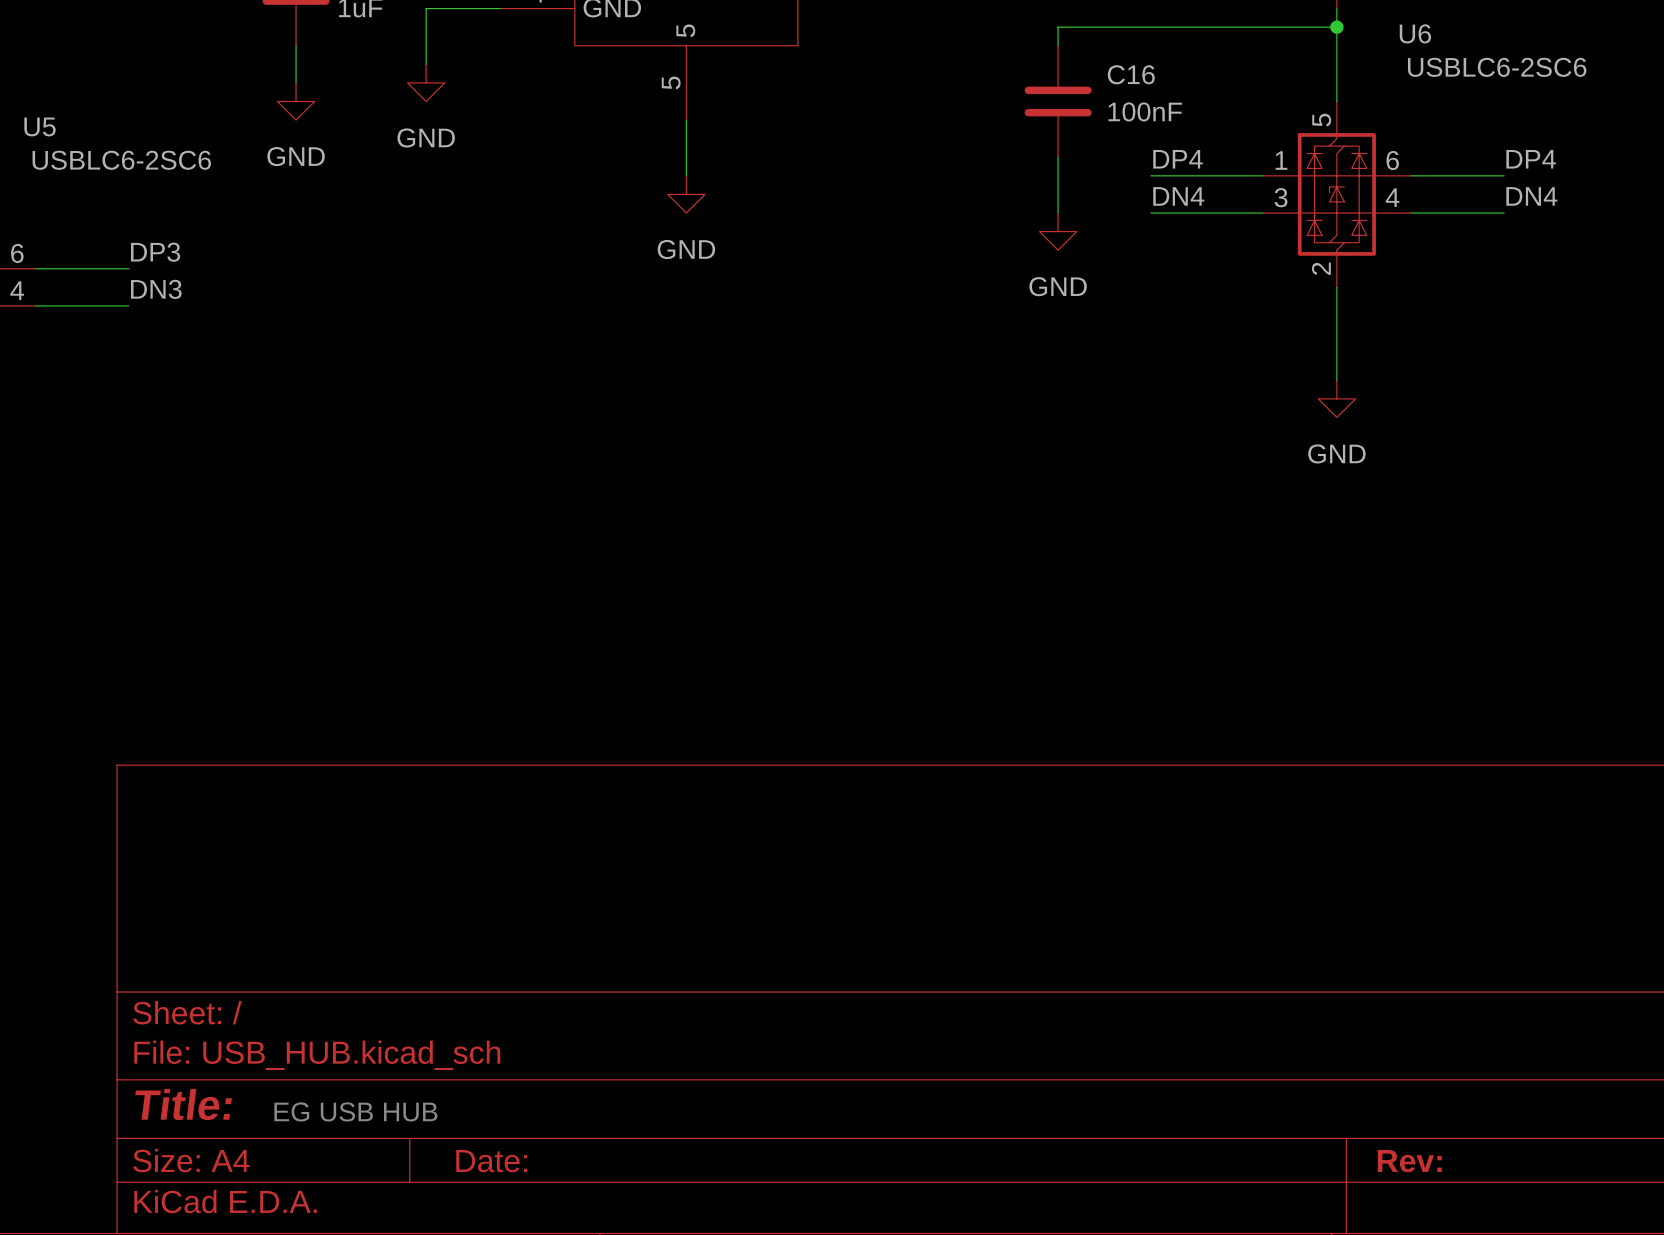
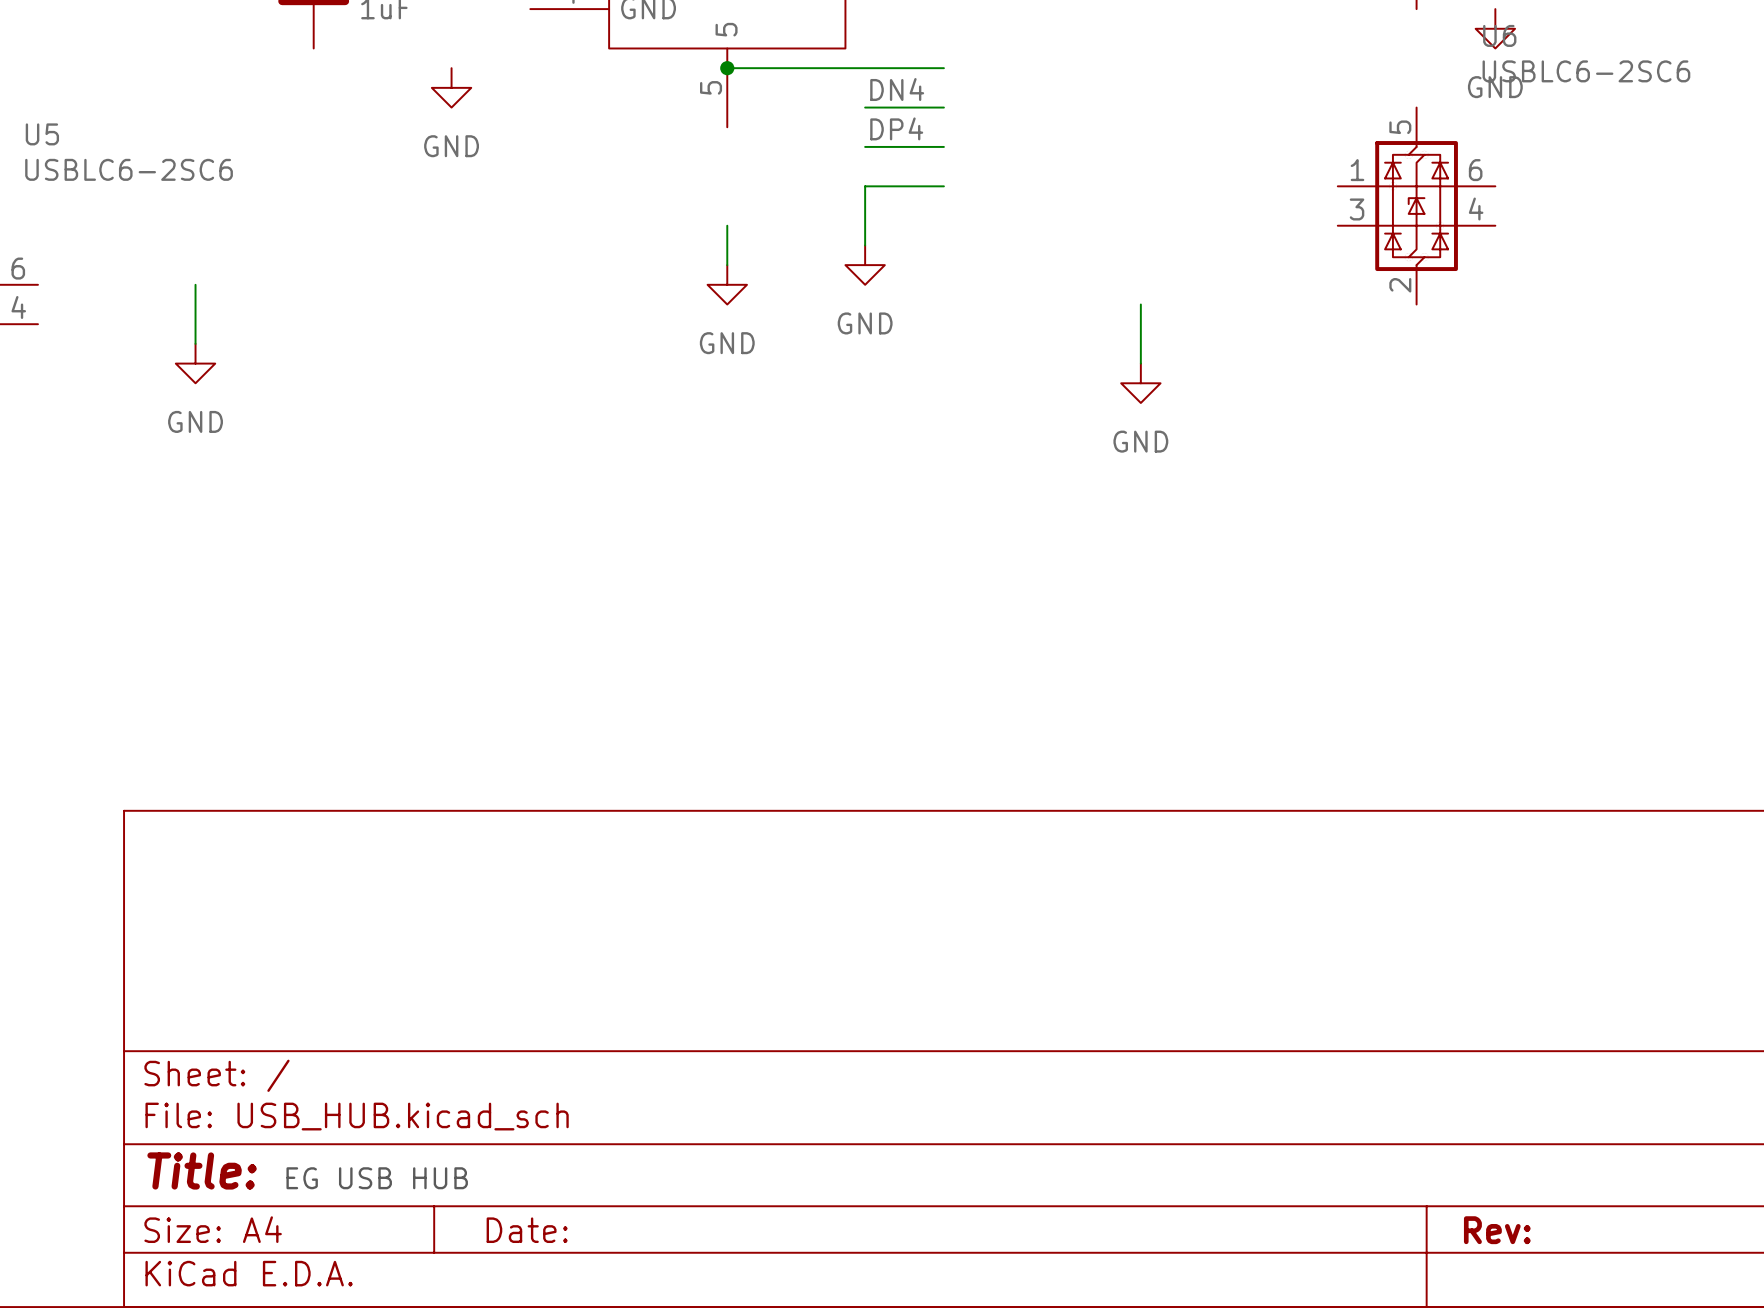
wire: (500, 8) (426, 8) (426, 64) -> none
wire: (1336, 8) (1336, 101) -> none
wire: (1336, 27) (1058, 27) (1058, 45) -> none
junction: (1336, 27) -> none
power symbol: none -> GND (1495, 28)
wire: (296, 45) (296, 82) -> none
wire: none -> (727, 68) (943, 68)
junction: none -> (727, 68)
label: none -> DN4 (897, 89)
power symbol: GND (296, 101) -> none
wire: none -> (865, 107) (943, 107)
C16: 100nF (1058, 101) -> none
wire: (686, 120) (686, 175) -> none
label: none -> DP4 (896, 128)
wire: none -> (865, 146) (943, 146)
wire: (1058, 157) (1058, 213) -> (1140, 304) (1140, 363)
label: DP4 (1178, 159) -> none
label: DP4 (1531, 159) -> none
wire: none -> (943, 186) (865, 186) (865, 245)
wire: (1151, 175) (1262, 175) -> none
wire: (1411, 175) (1504, 175) -> none
power symbol: GND (686, 194) -> none
label: DN4 (1178, 196) -> none
label: DN4 (1531, 196) -> none
wire: none -> (727, 225) (727, 265)
wire: (1151, 213) (1262, 213) -> none
wire: (1411, 213) (1504, 213) -> none
power symbol: GND (1058, 231) -> none
power symbol: none -> GND (865, 265)
label: DP3 (155, 252) -> none
wire: (35, 268) (128, 268) -> none
wire: none -> (195, 284) (195, 343)
power symbol: none -> GND (727, 284)
wire: (1336, 287) (1336, 380) -> none
label: DN3 (156, 289) -> none
wire: (35, 305) (128, 305) -> none
power symbol: none -> GND (195, 363)
power symbol: none -> GND (1140, 383)
power symbol: GND (1336, 398) -> none

